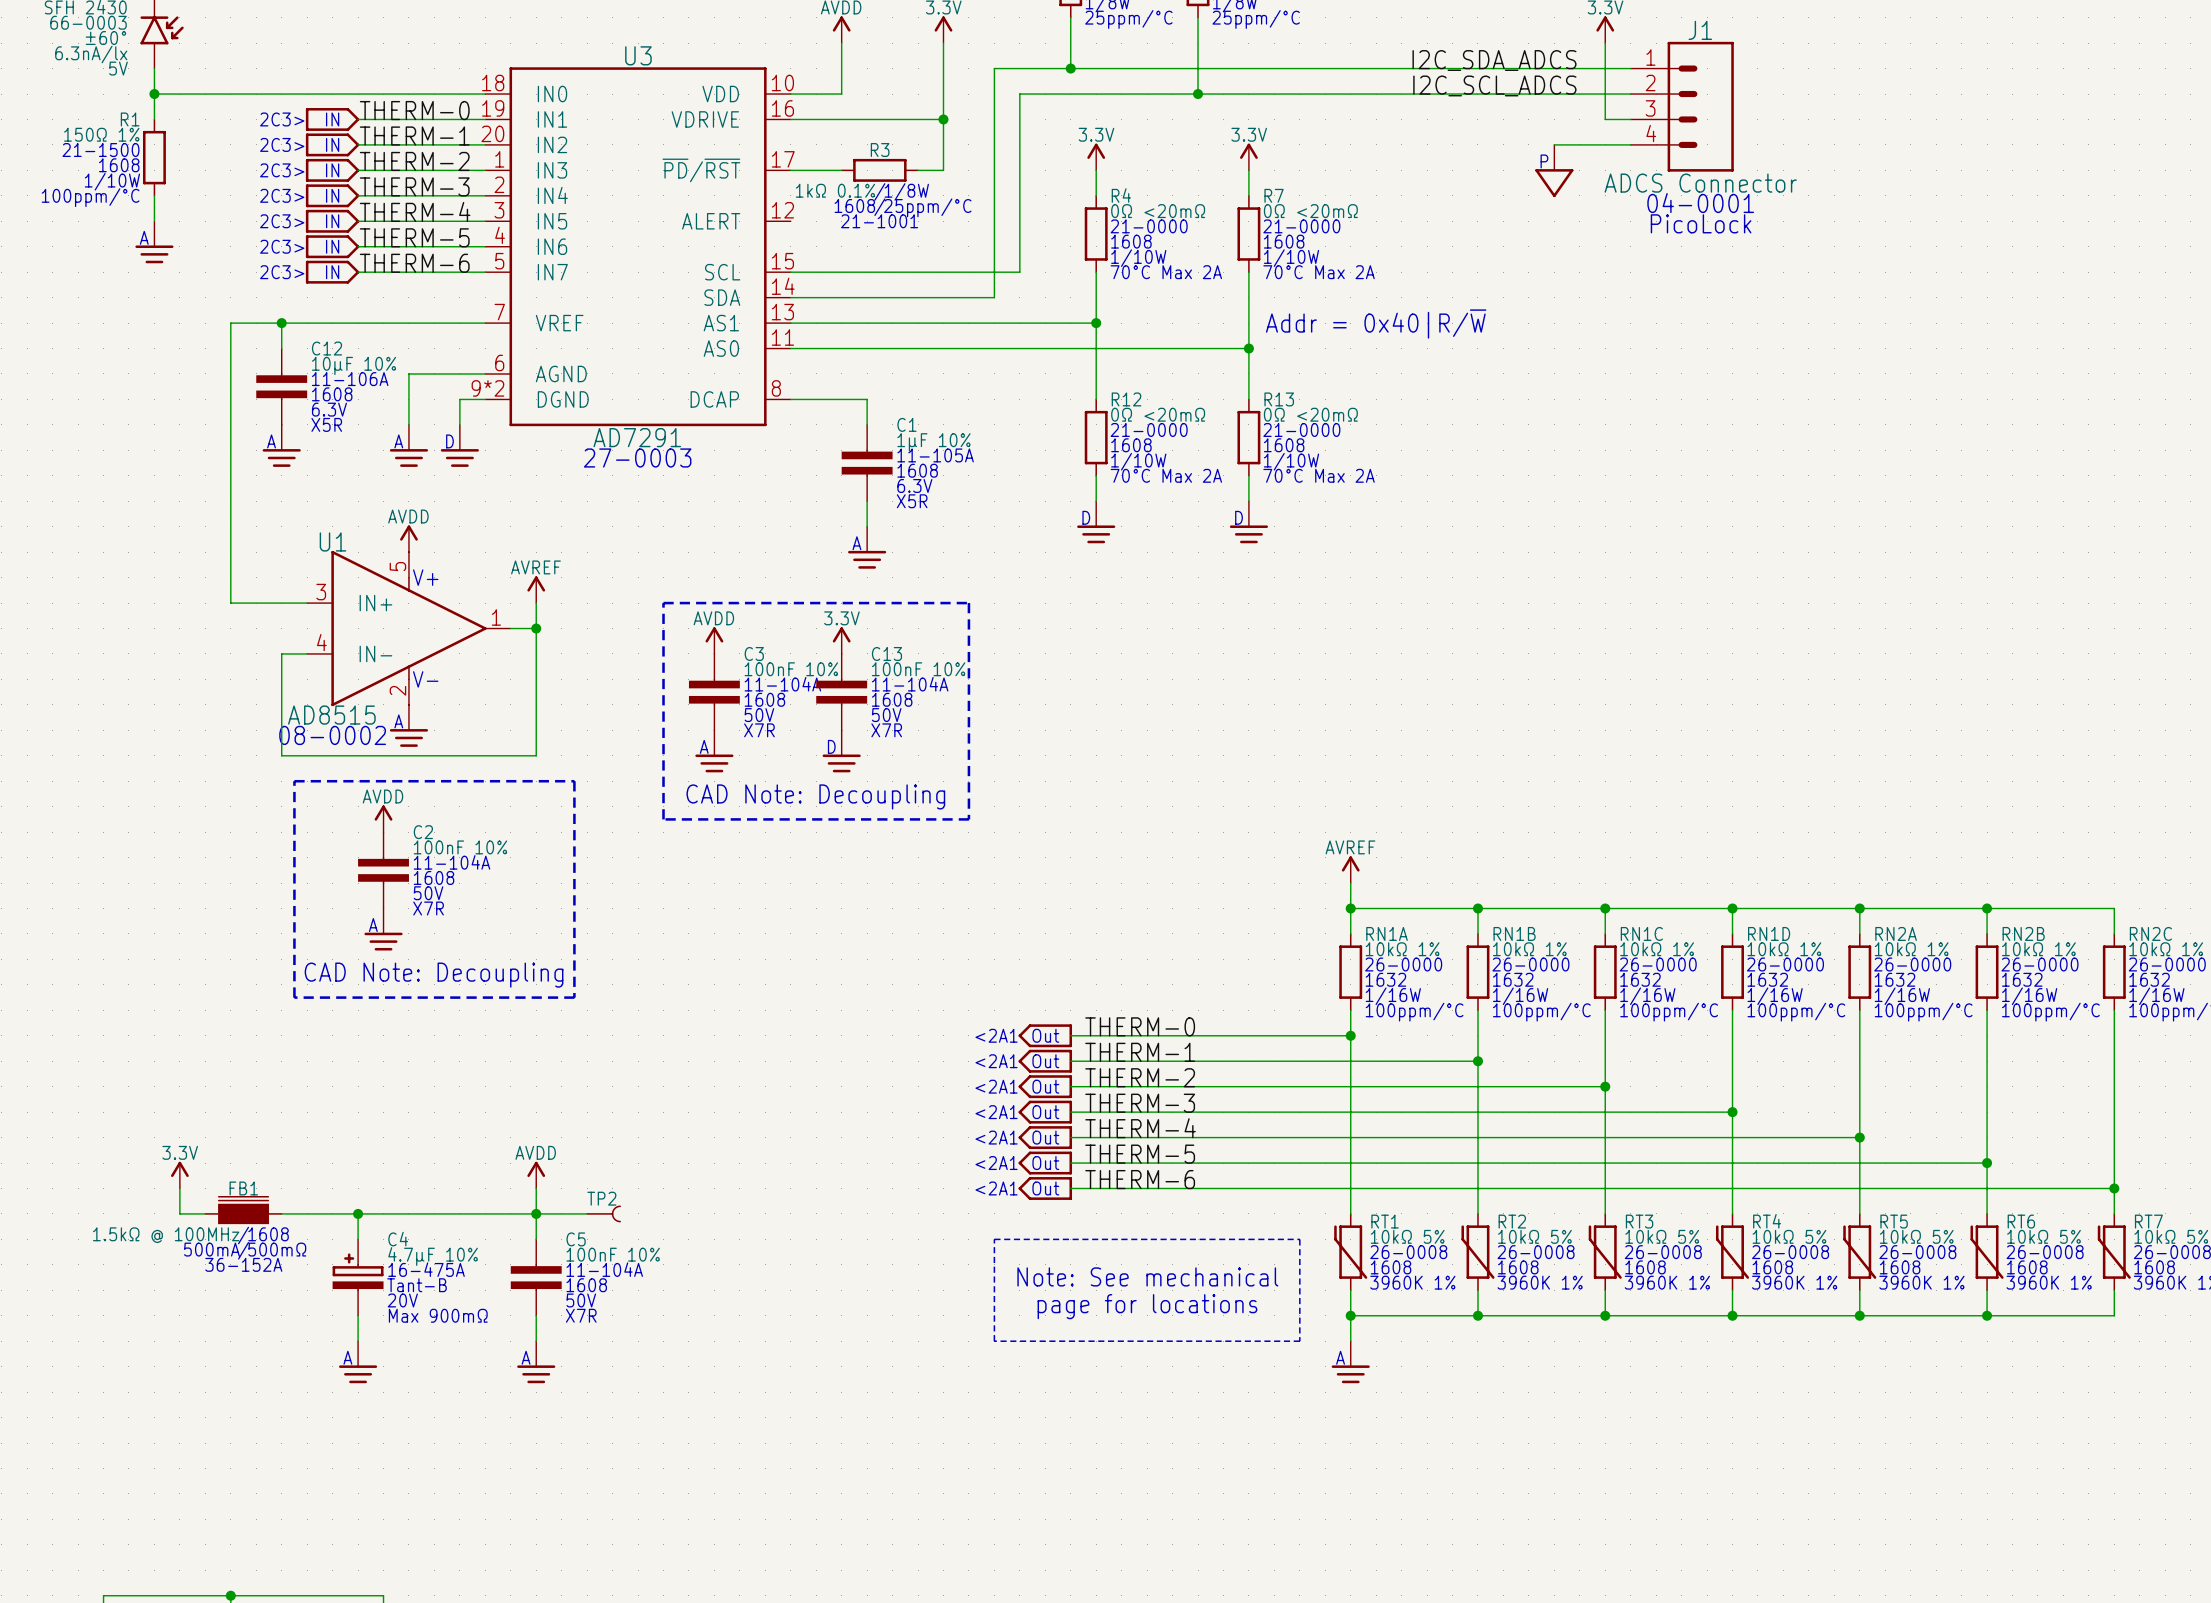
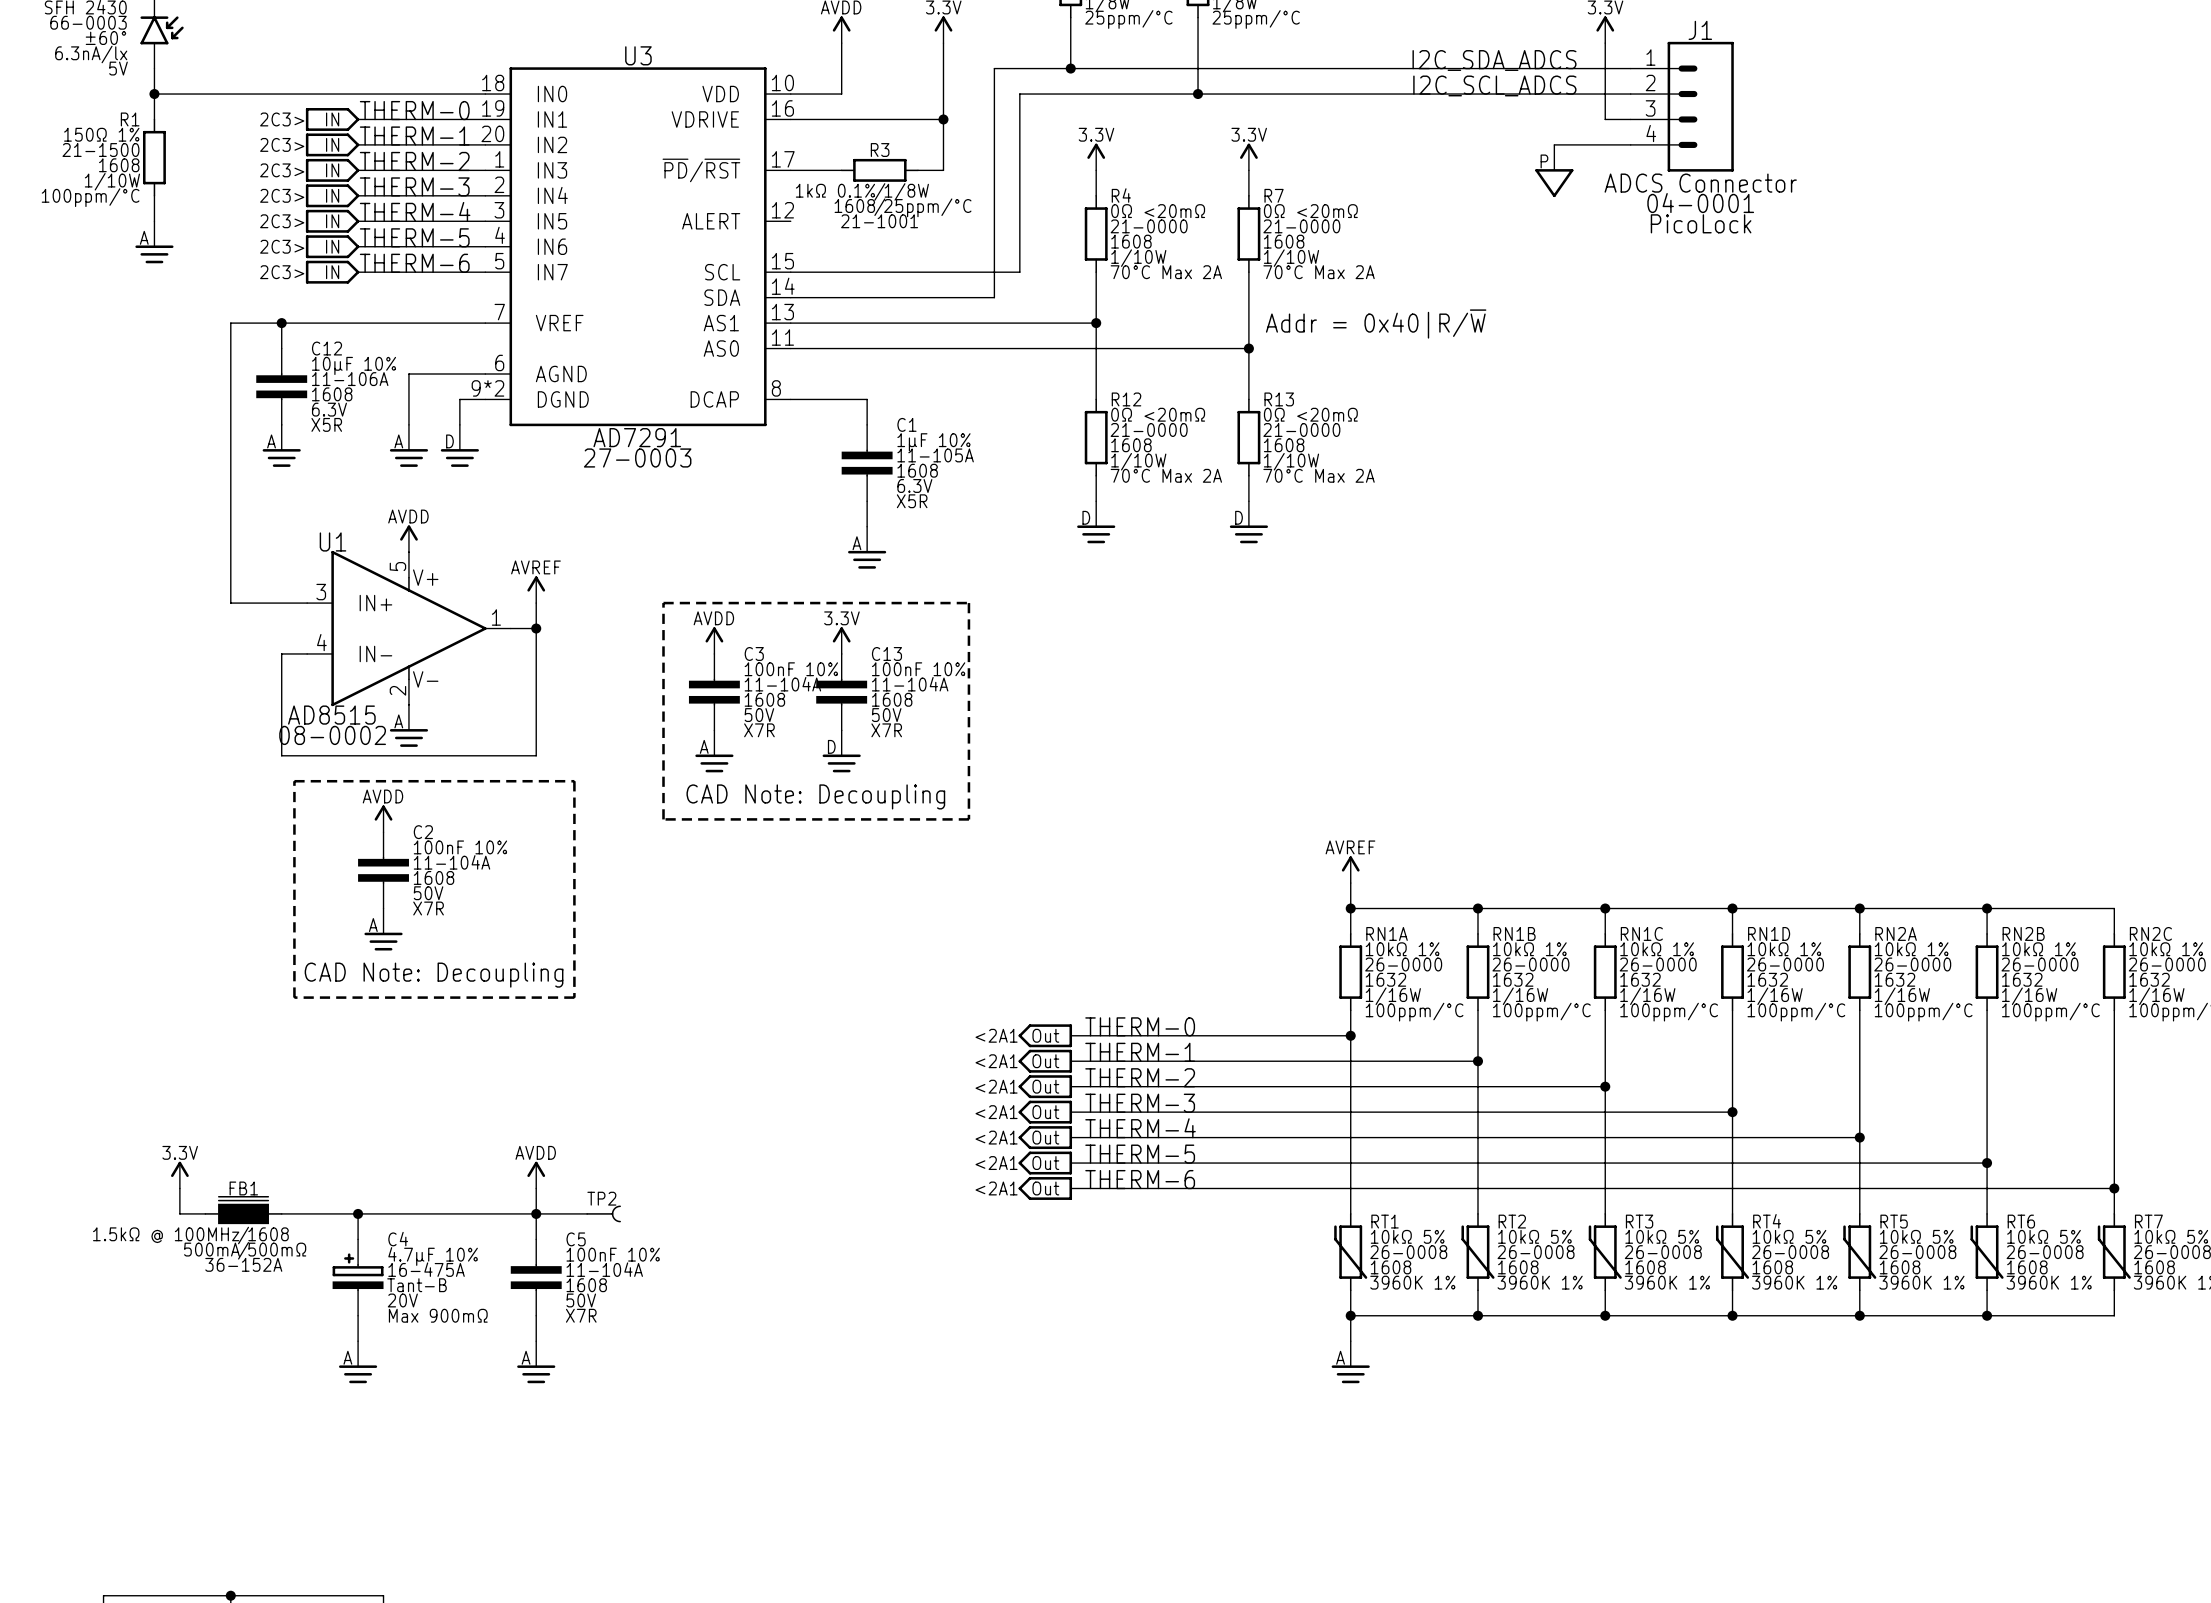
line: (994, 1239) (1299, 1239) (1299, 1341) (994, 1341) (994, 1239) -> none
text: Note: See mechanical (1147, 1276) -> none
text: page for locations (1147, 1306) -> none

